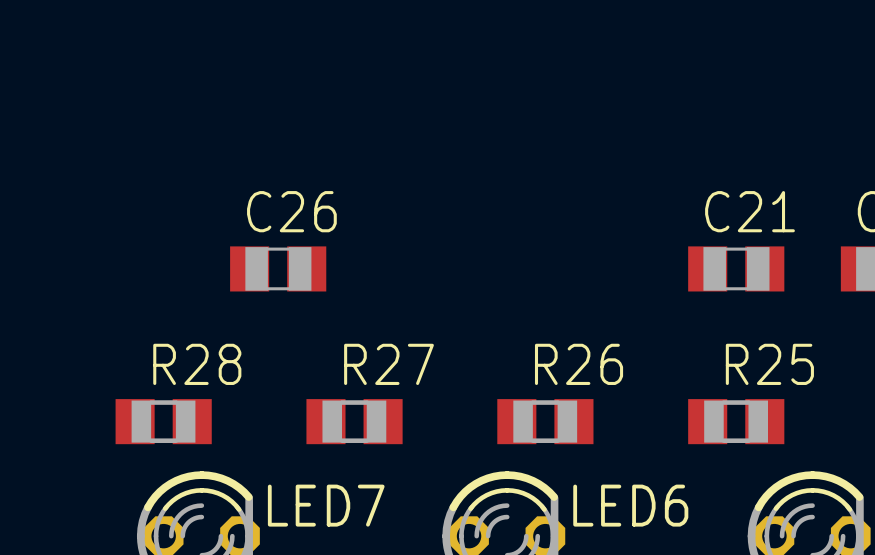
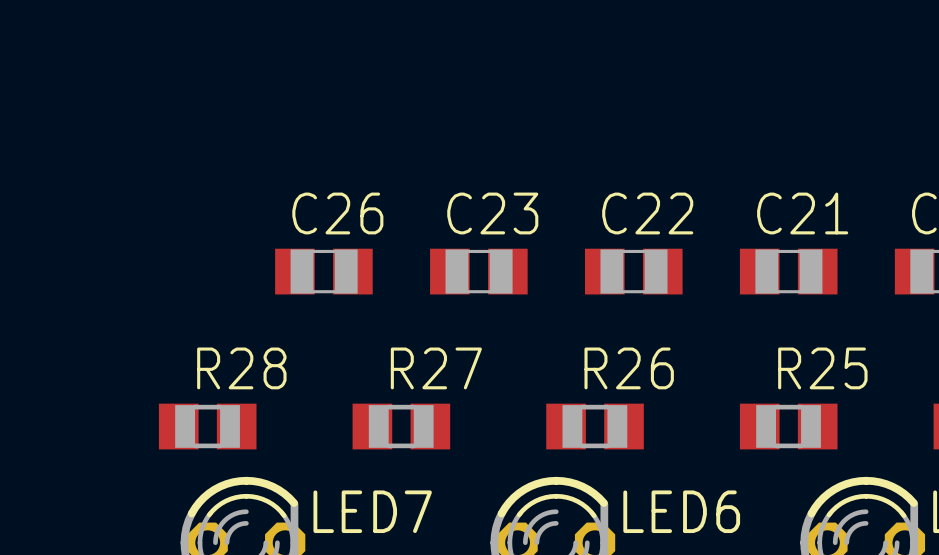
C23: none -> (478, 271)
C22: none -> (633, 271)

